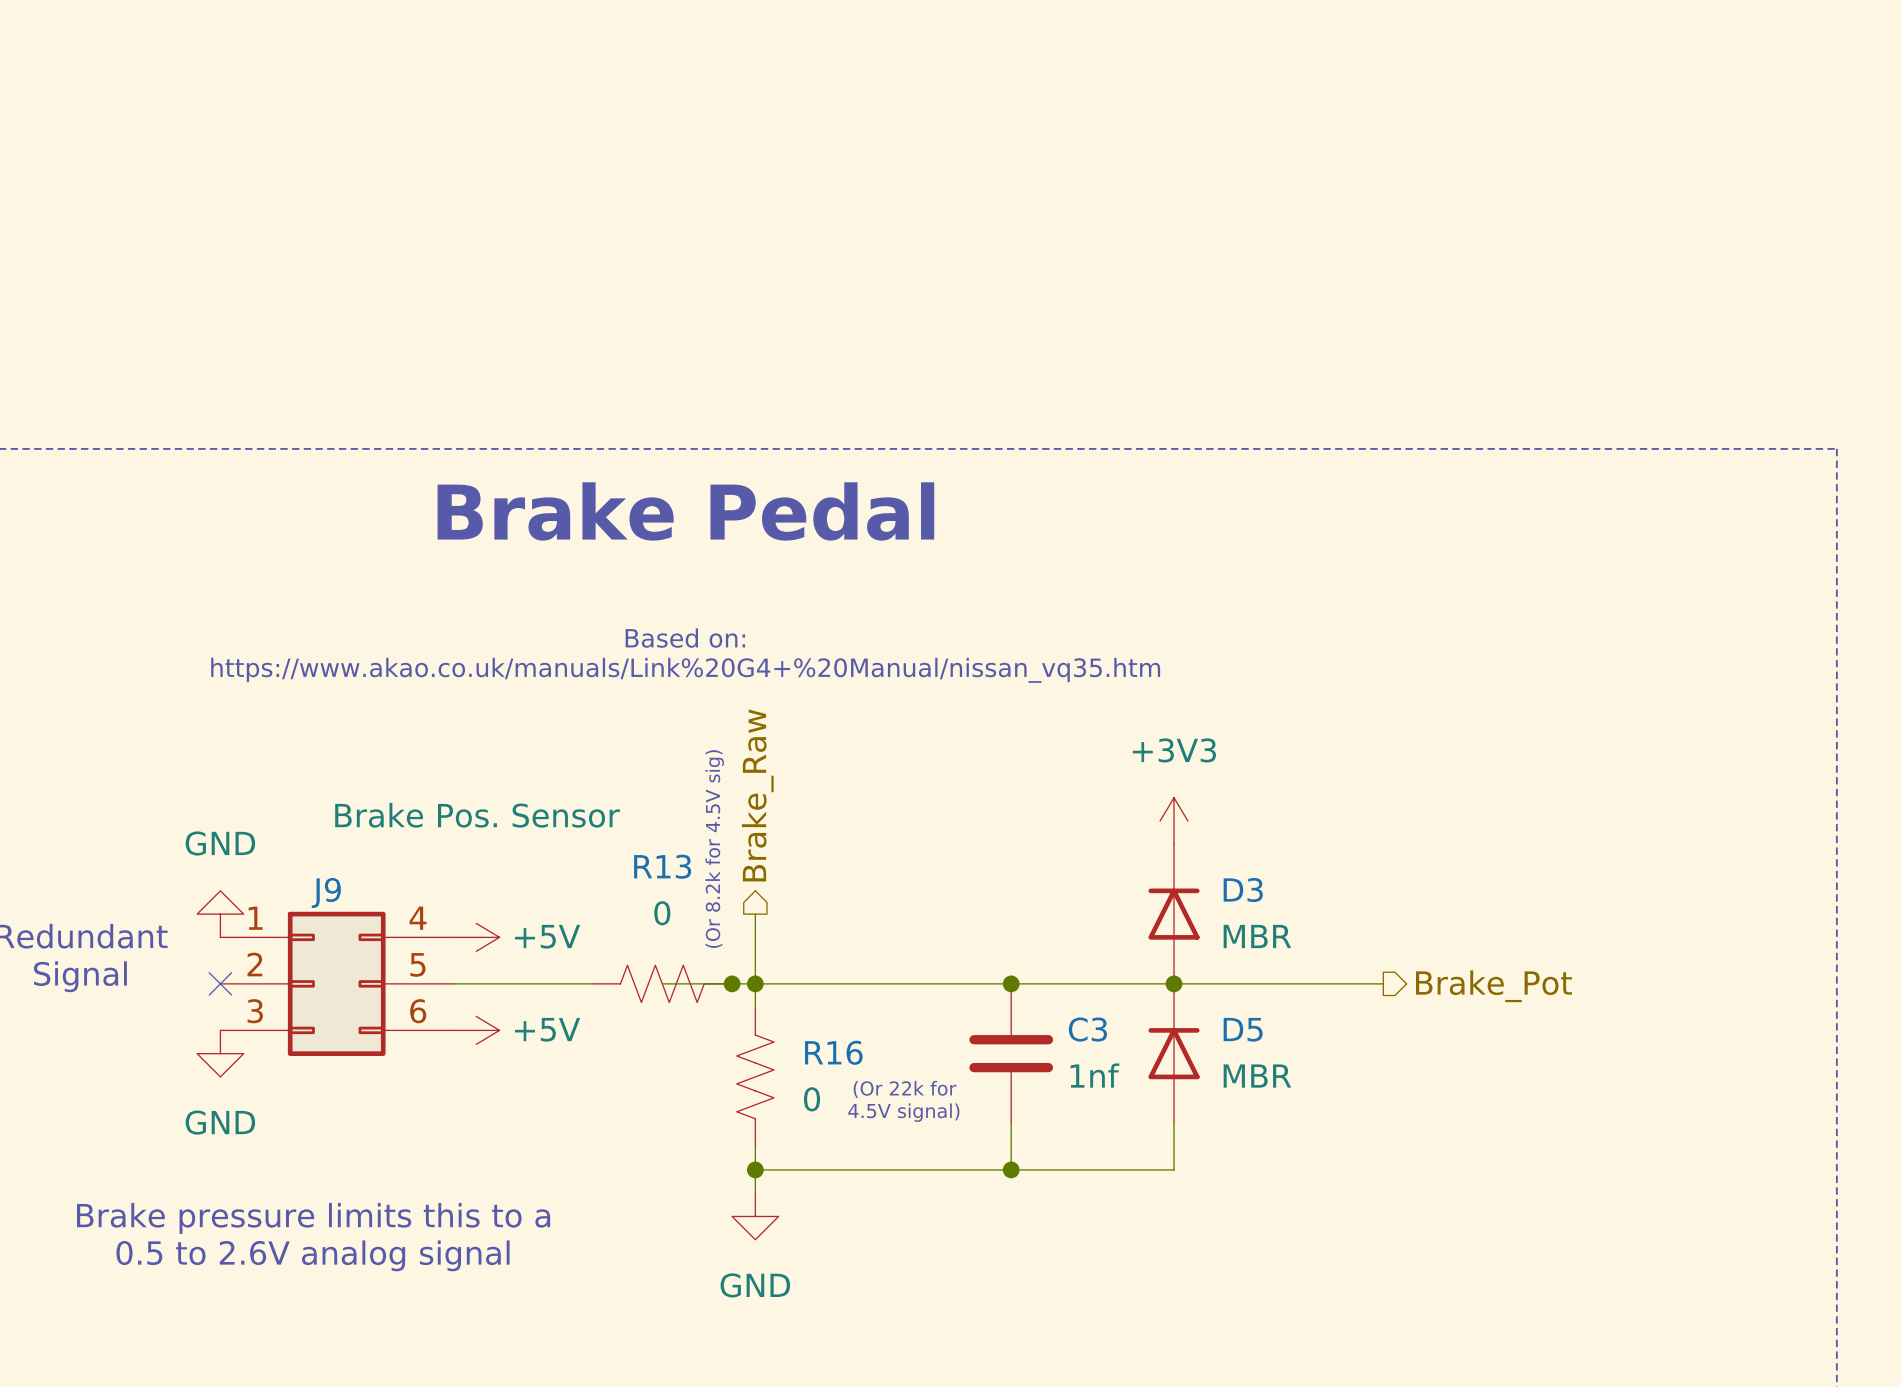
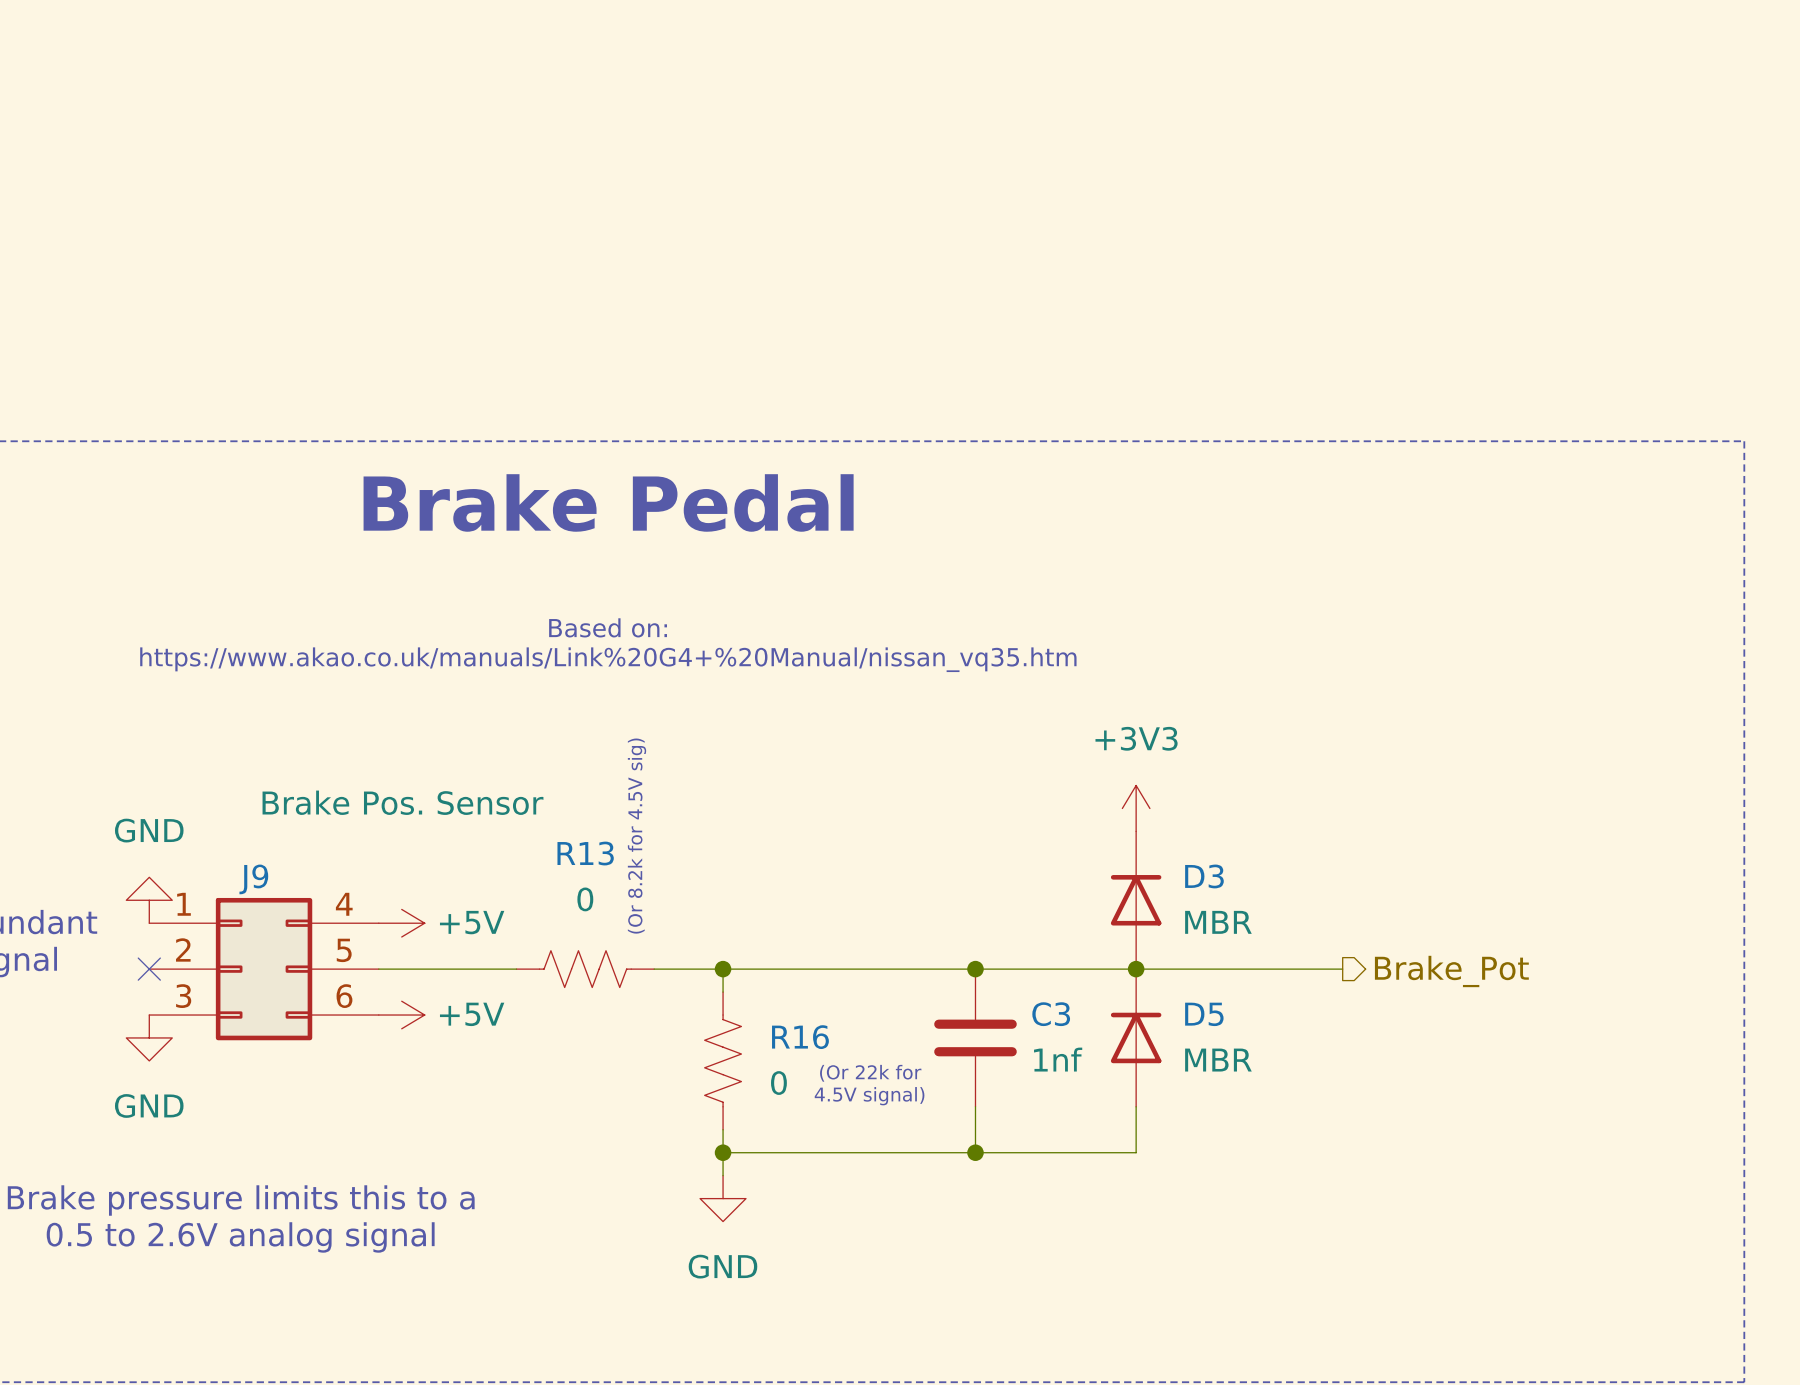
hierarchical label: Brake_Raw (757, 795) -> none
power symbol position: +3V3 (1174, 821) -> +3V3 (1136, 808)
wire: (755, 914) (755, 1007) -> none
D3 position: (1174, 914) -> (1136, 900)
wire: (662, 983) (732, 983) -> none
junction: (732, 983) -> none
junction: (755, 983) -> none
wire: none -> (723, 969) (723, 992)
junction: none -> (723, 969)
junction position: (1011, 983) -> (975, 969)
junction position: (1174, 983) -> (1136, 969)
wire: none -> (1296, 969) (1342, 969)
hierarchical label position: Brake_Pot (1493, 986) -> Brake_Pot (1451, 971)
C3 position: (1011, 1053) -> (975, 1037)
D5 position: (1174, 1053) -> (1136, 1037)
R16 position: (755, 1076) -> (723, 1060)
text position: (Or 22k for (905, 1089) -> (Or 22k for (870, 1073)
text position: 4.5V signal) (903, 1112) -> 4.5V signal) (869, 1096)
wire: (1011, 1123) (1011, 1169) -> (975, 1106) (975, 1152)
wire: (1174, 1123) (1174, 1169) -> (1136, 1106) (1136, 1152) (1090, 1152)
wire: (755, 1146) (755, 1193) -> (723, 1129) (723, 1175)
wire: (755, 1169) (801, 1169) -> none
junction position: (755, 1169) -> (723, 1152)
junction position: (1011, 1169) -> (975, 1152)
power symbol position: GND (755, 1216) -> GND (723, 1198)

